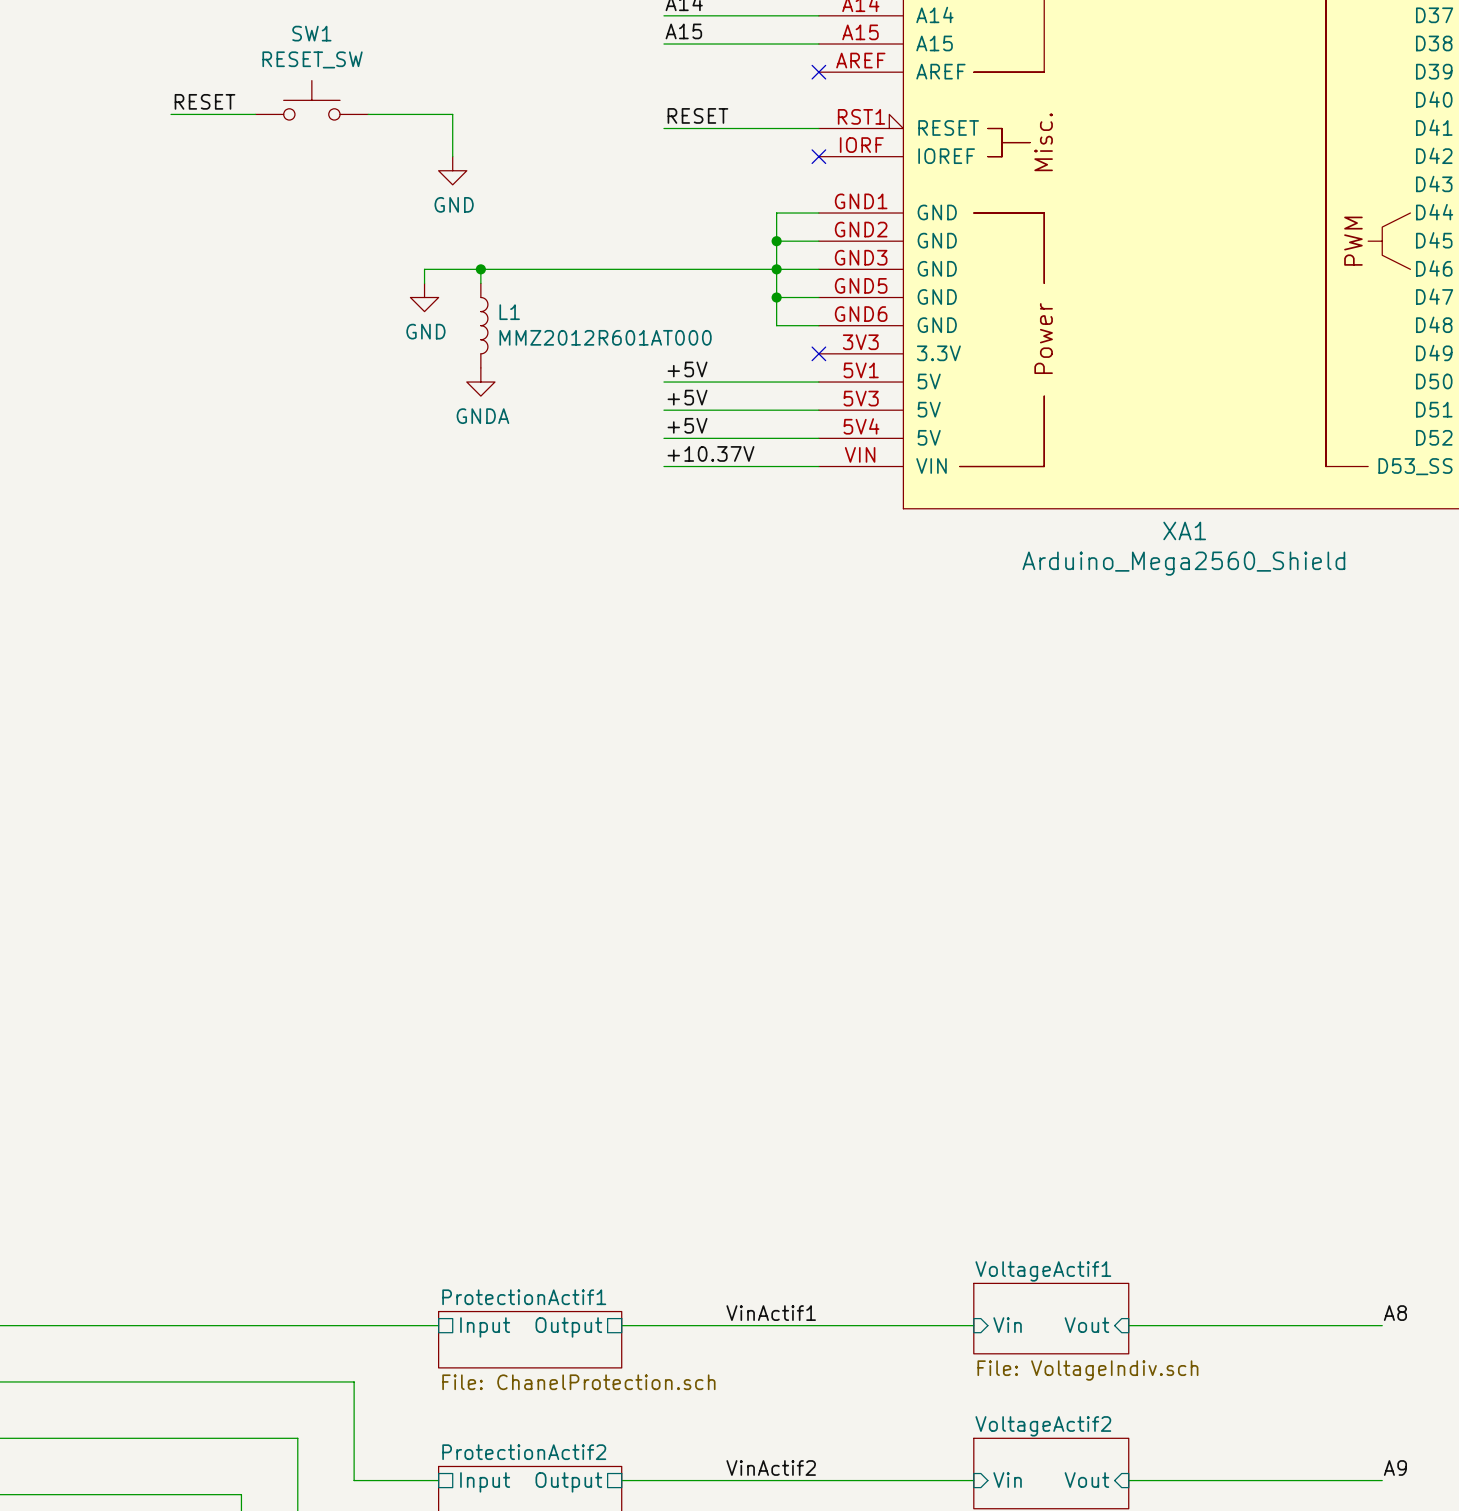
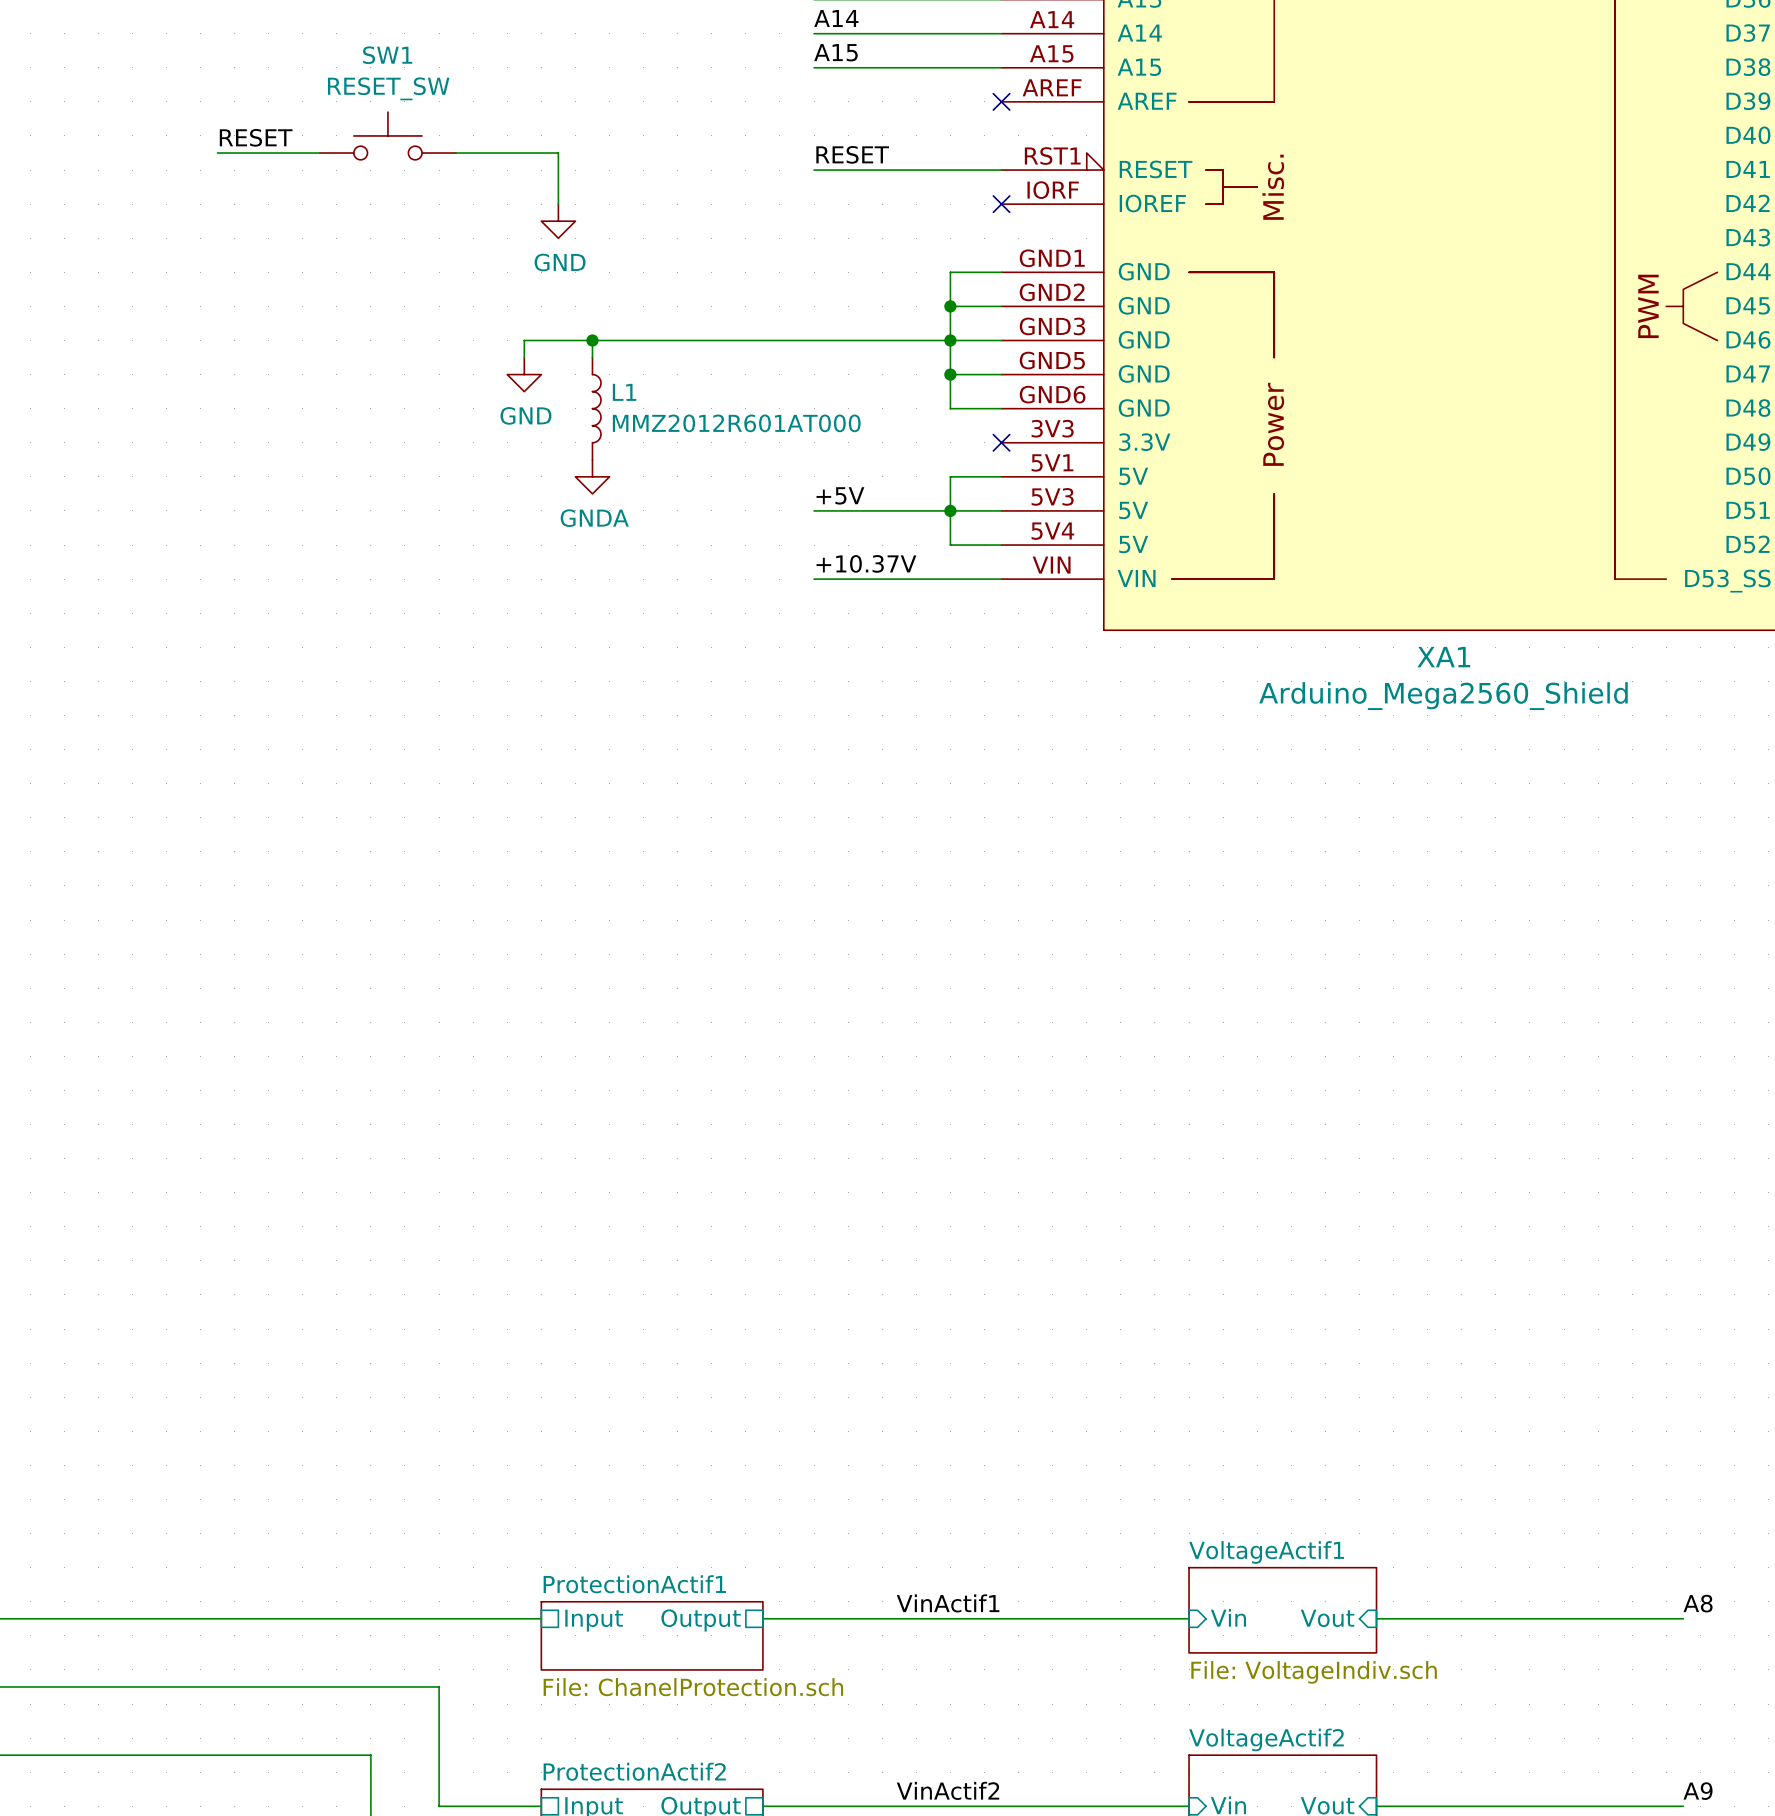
label: +5V (687, 369) -> none
wire: (663, 382) (776, 382) -> (950, 545) (950, 476)
junction: none -> (950, 510)
label: +5V (687, 425) -> none
wire: (663, 438) (776, 438) -> none

